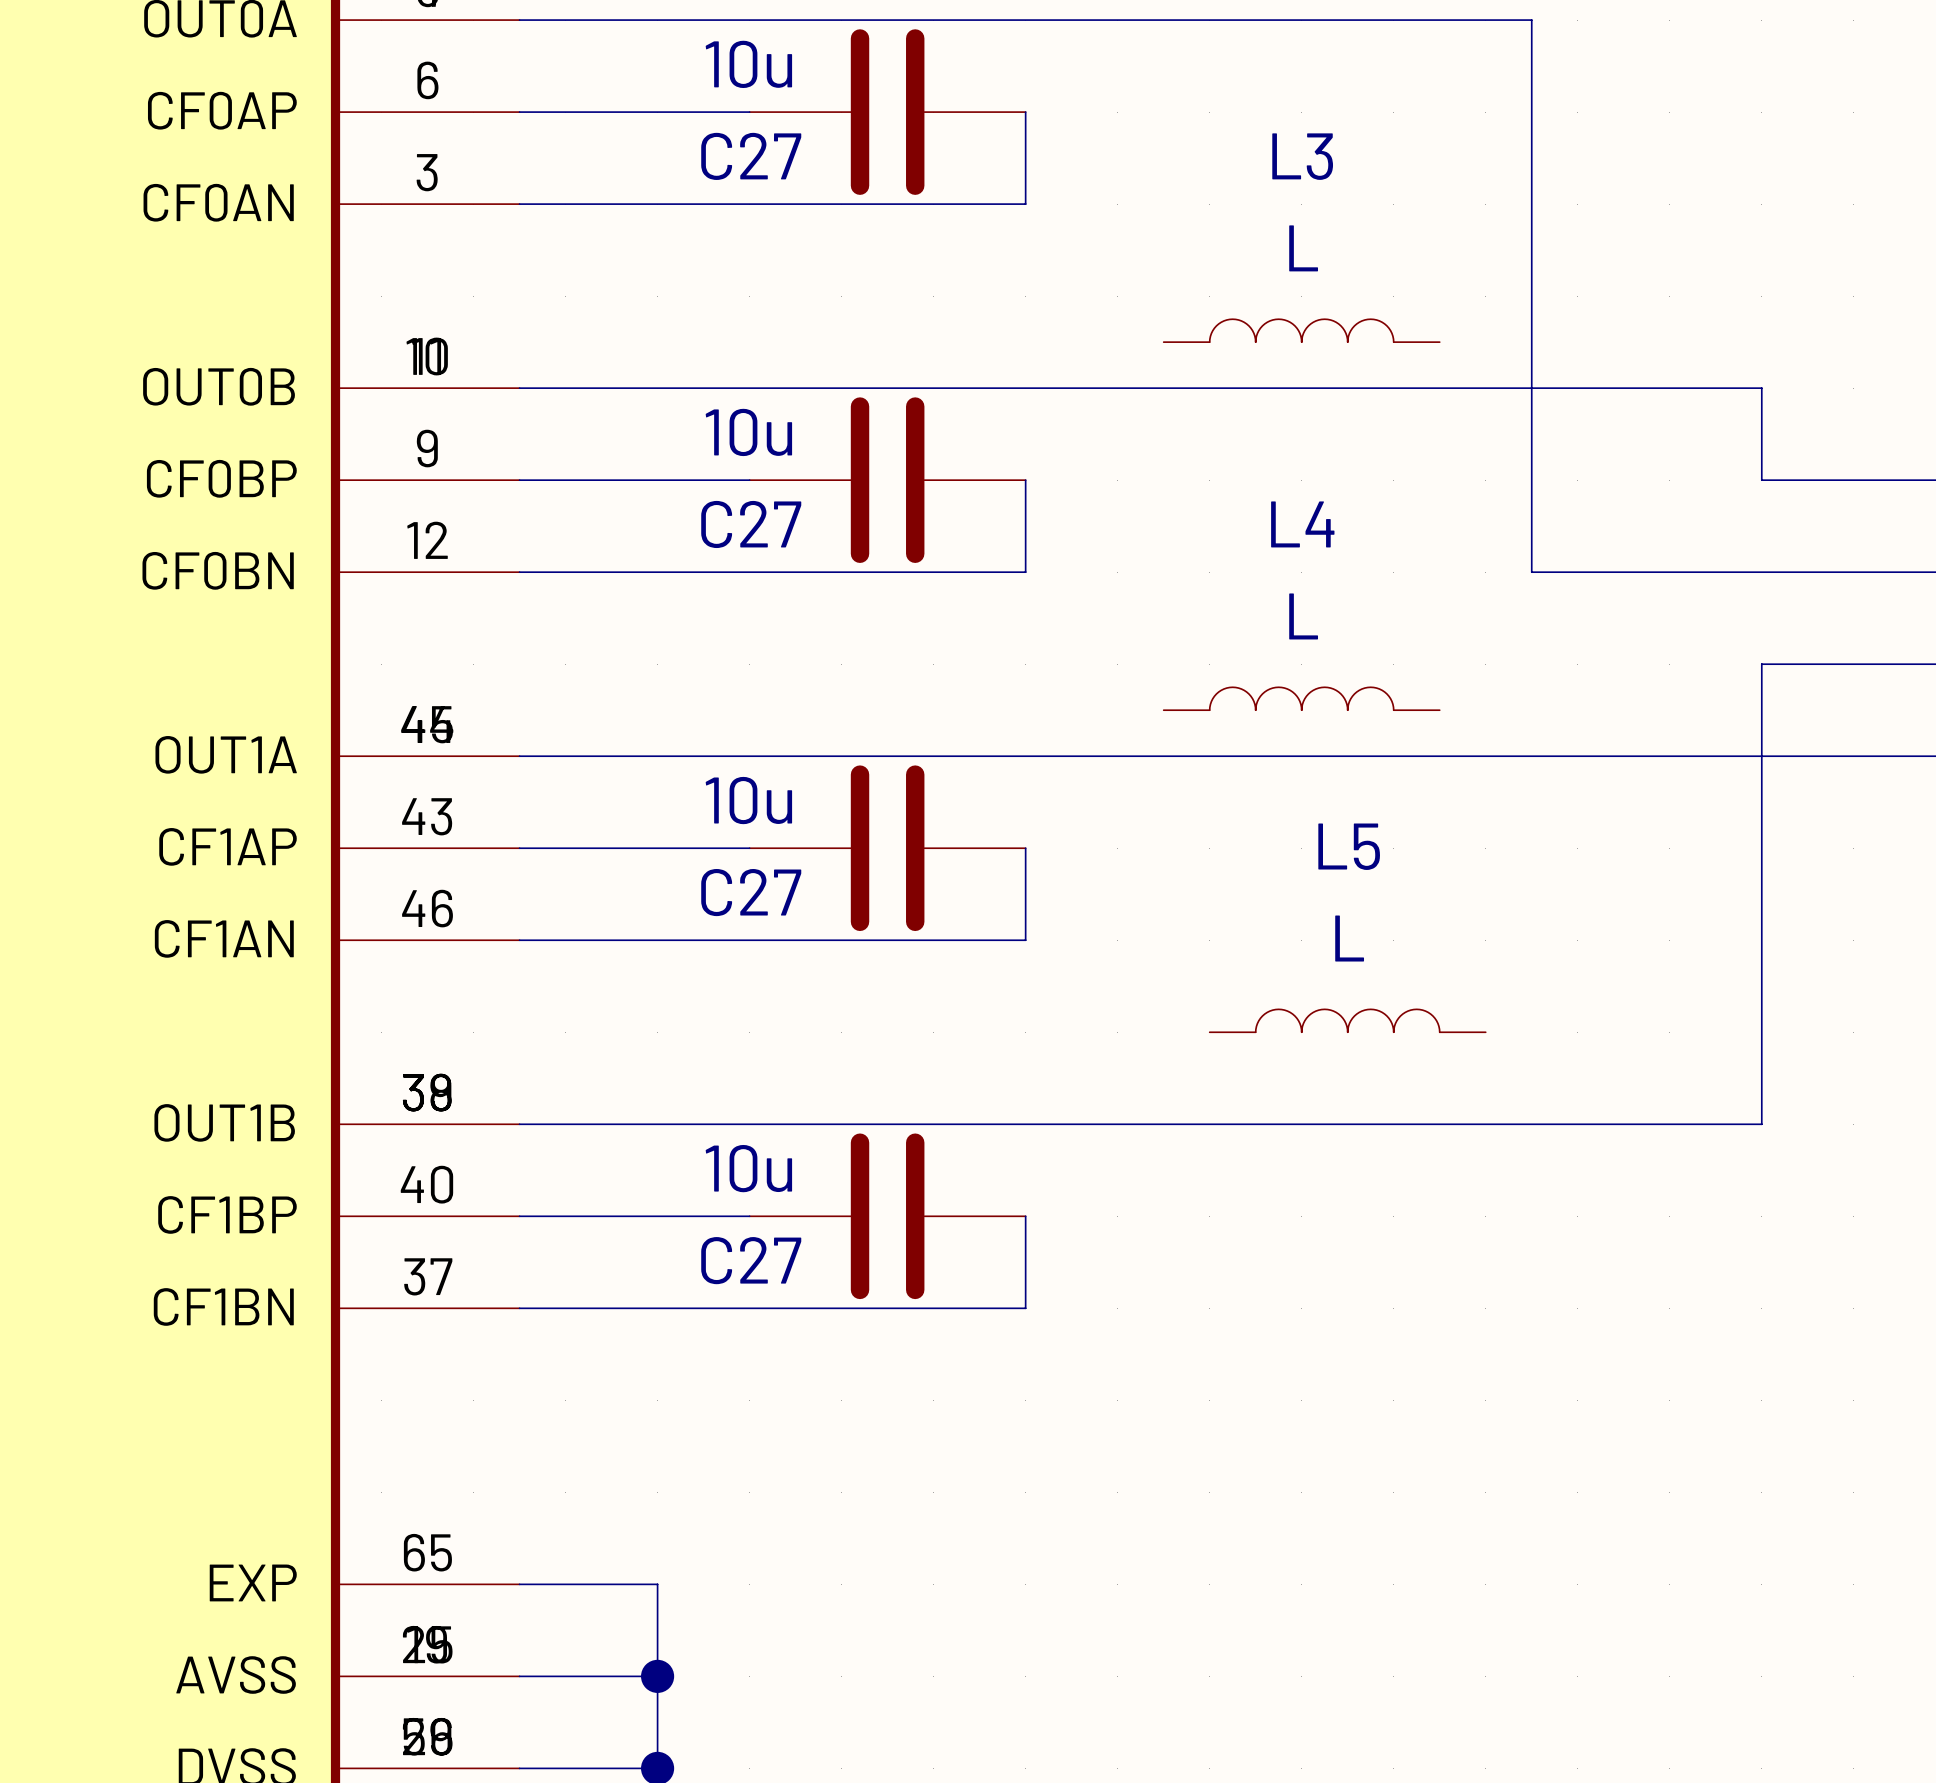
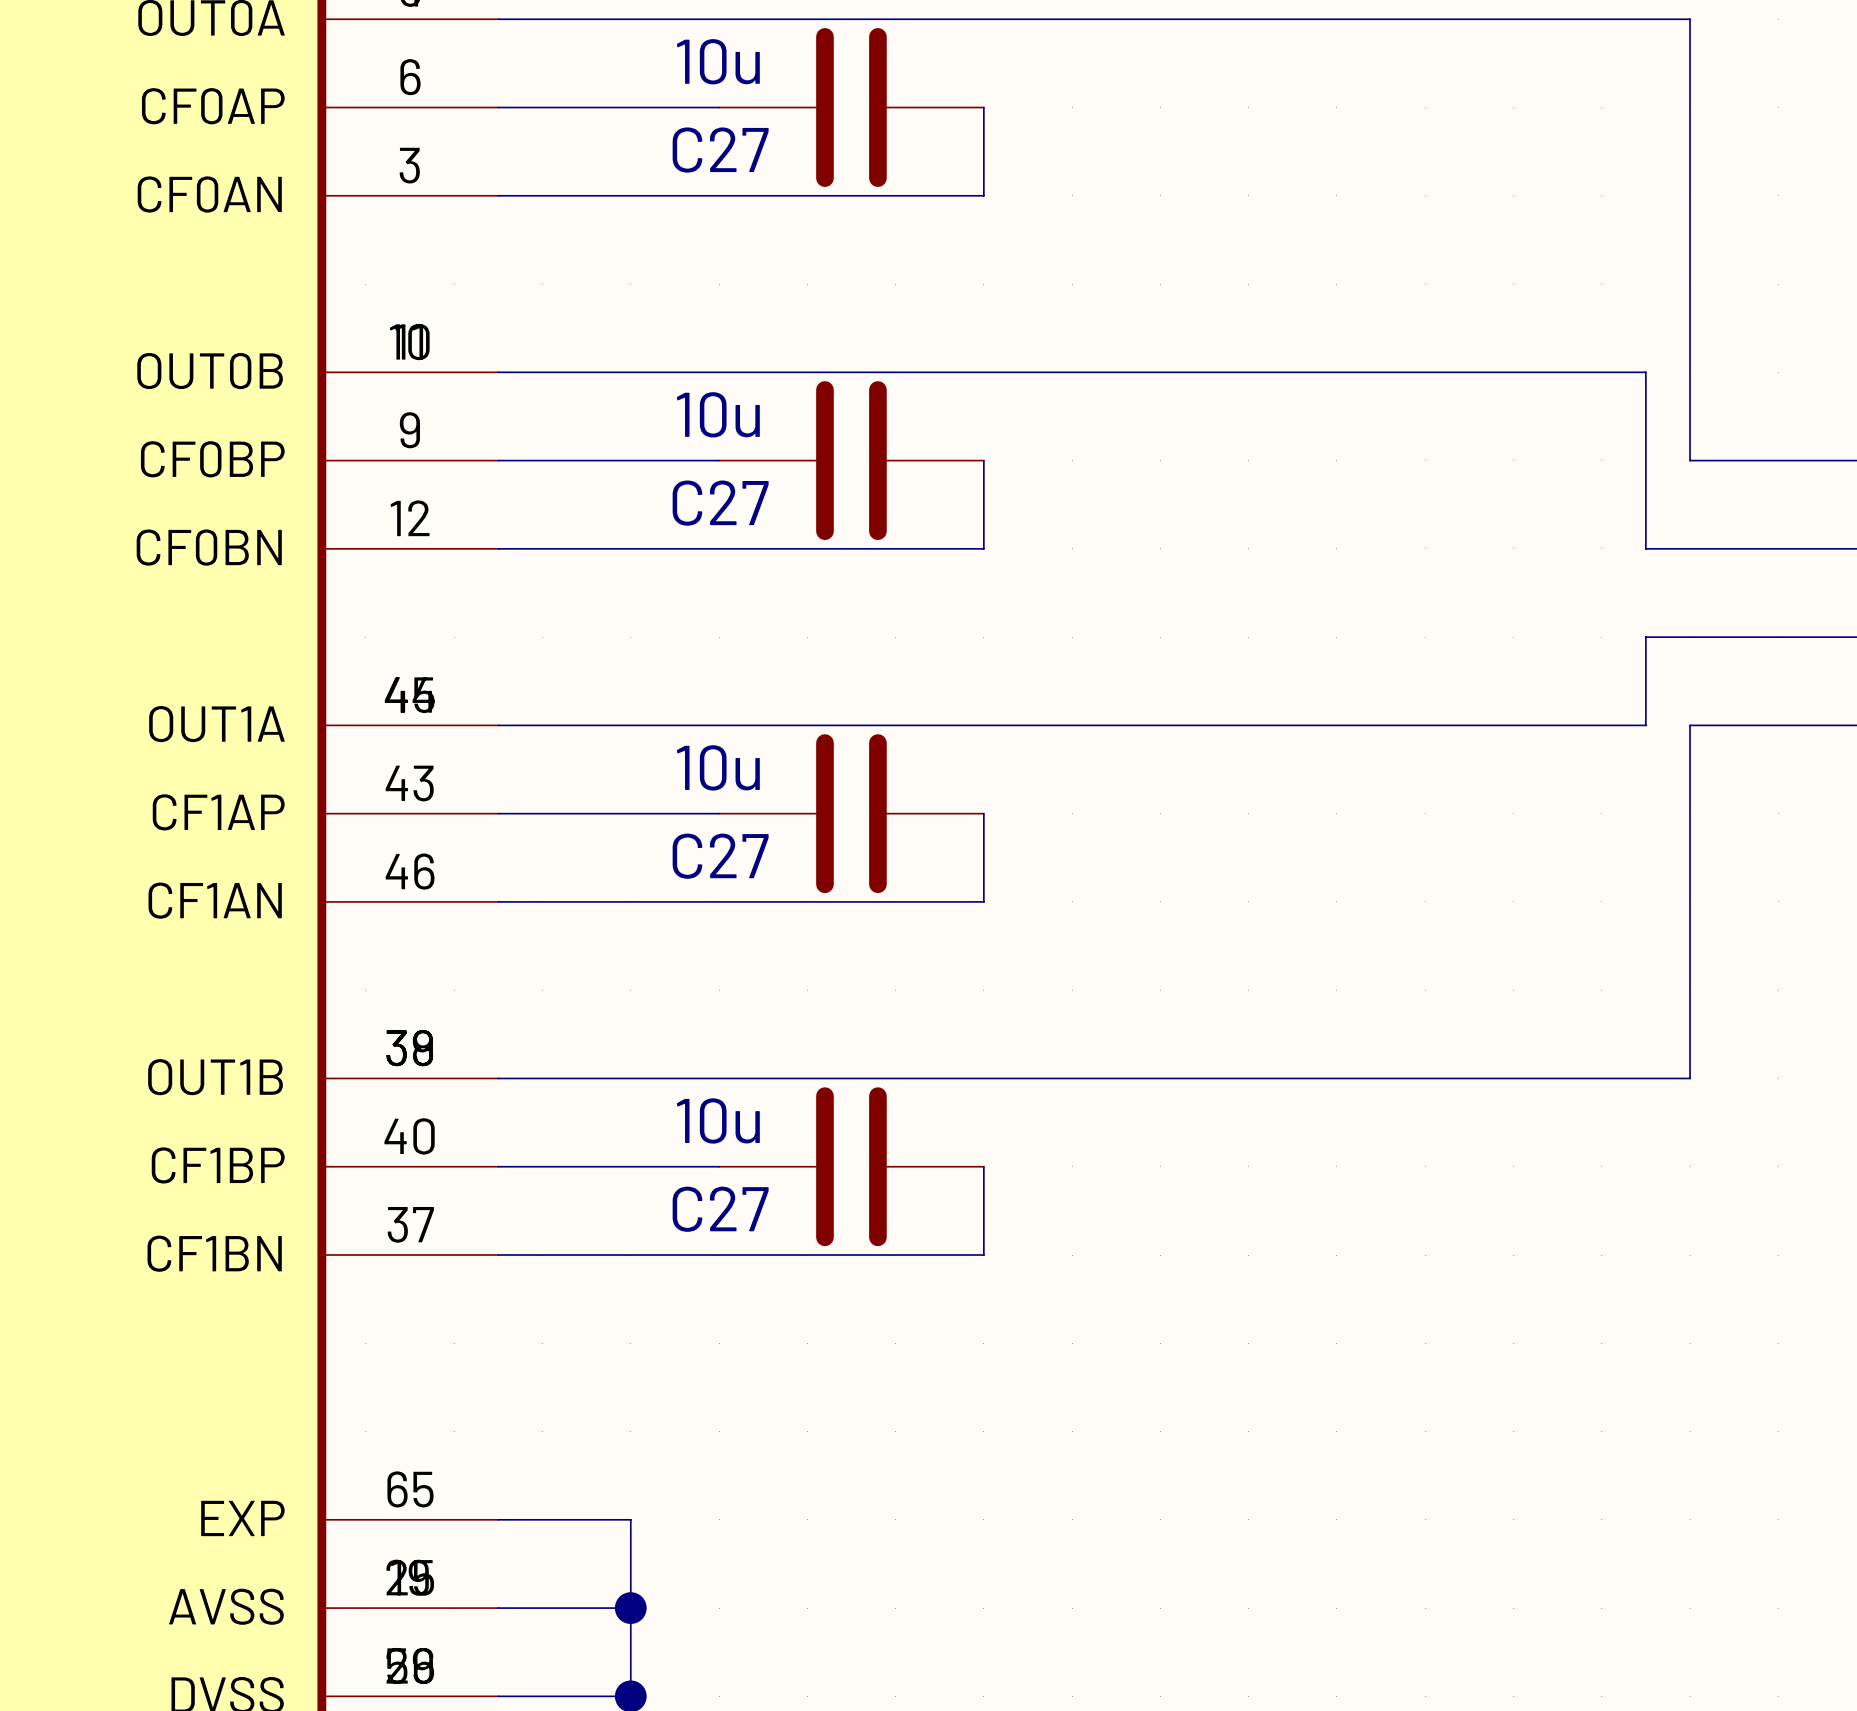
wire: (1531, 20) (1531, 572) (1715, 572) -> (1469, 19) (1690, 19) (1690, 372)
L3: L (1301, 330) -> none
wire: (1715, 388) (1761, 388) -> (1645, 372) (1645, 548)
wire: (1761, 664) (1761, 756) (1715, 756) -> (1690, 637) (1645, 637) (1645, 725)
L4: L (1301, 698) -> none
L5: L (1347, 1020) -> none

